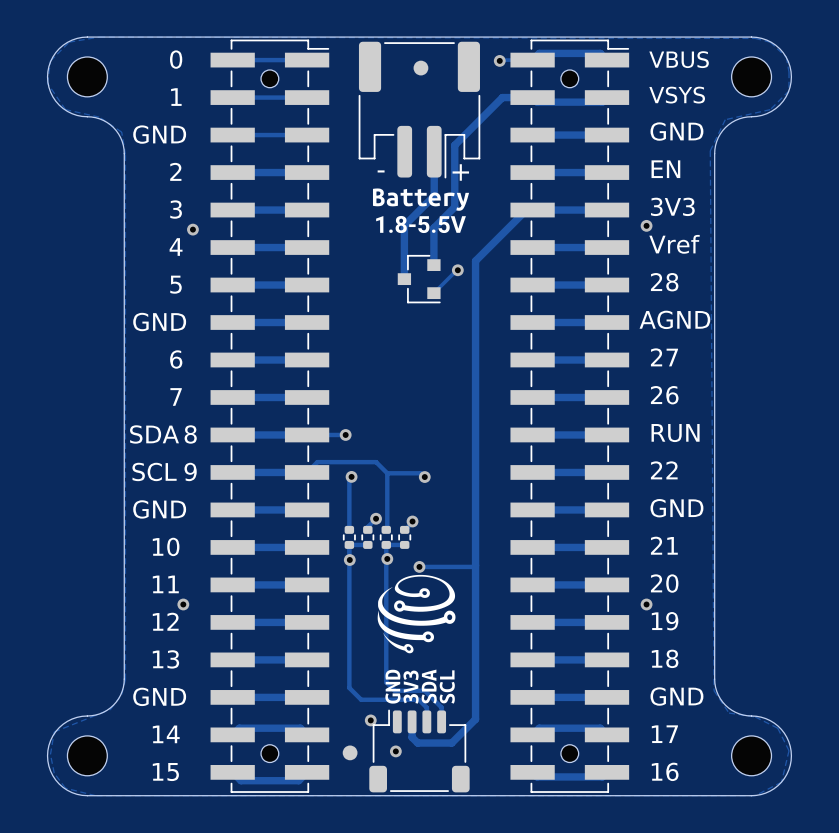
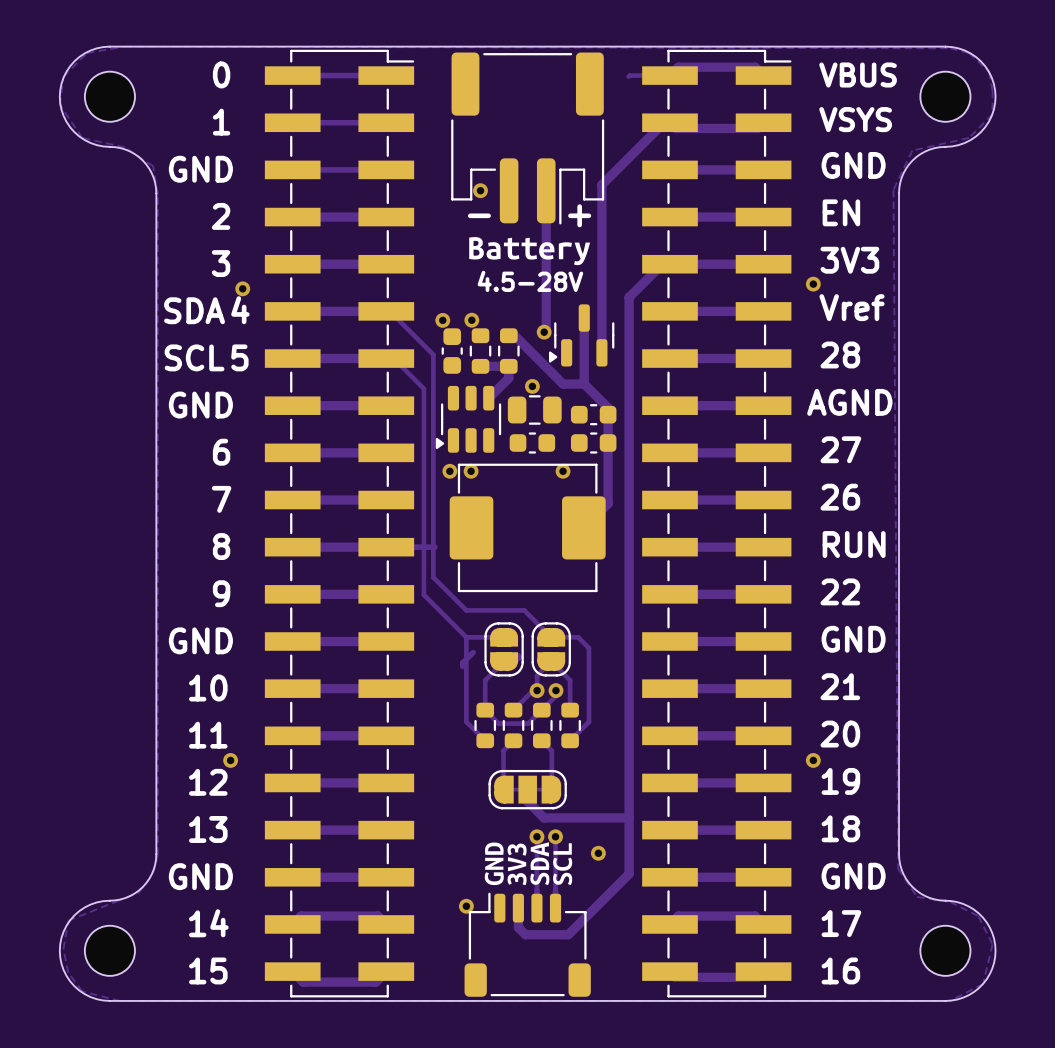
part footprint: [210, 39, 330, 793] -> [264, 49, 415, 998]
part footprint: [510, 39, 630, 793] -> [642, 49, 792, 998]
via: (499, 60) -> none
part: (420, 68) -> none
track: (527, 97) (502, 97) (454, 145) (454, 207) (433, 227) (433, 265) -> (664, 122) (601, 184) (601, 352)
via: none -> (480, 190)
track: (434, 195) (404, 225) (404, 279) -> (546, 246) (546, 330) (544, 332)
drawing: [376, 215, 466, 234] -> none
text: none -> 4.5-28V (530, 281)
track: (500, 236) (475, 260) (475, 719) -> (629, 297) (629, 873) (598, 904)
text position: 4 (176, 247) -> 4 (240, 310)
track: none -> (386, 311) (390, 311) (433, 354) (433, 577) (466, 610) (524, 610) (551, 637) (578, 637) (588, 648) (588, 721) (570, 740)
track: none -> (584, 318) (584, 384)
via: none -> (442, 320)
via: none -> (471, 320)
via: none -> (544, 332)
track: none -> (508, 335) (514, 335) (563, 384) (584, 384)
part: none -> (581, 335)
track: (457, 270) (433, 293) -> none
via: (457, 270) -> none
part: none -> (452, 351)
part: none -> (480, 351)
part: none -> (508, 351)
part: (419, 279) -> none
text position: 5 (176, 284) -> 5 (239, 357)
track: none -> (386, 358) (393, 358) (423, 388) (423, 594) (466, 637)
track: none -> (480, 366) (508, 366) (508, 378) (488, 398)
track: none -> (584, 384) (608, 407) (608, 503) (583, 527)
via: none -> (532, 386)
part: none -> (534, 409)
part: none -> (593, 414)
part: none -> (468, 419)
part: none -> (532, 443)
part: none -> (593, 443)
via: none -> (449, 471)
via: none -> (471, 471)
via: none -> (563, 471)
part: none -> (527, 527)
text position: SDA (154, 434) -> SDA (194, 310)
text position: 8 (190, 434) -> 8 (221, 546)
via: (345, 434) -> none
text position: SCL (154, 471) -> SCL (194, 357)
text position: 9 (190, 471) -> 9 (221, 593)
track: (307, 472) (317, 462) (376, 462) (387, 473) -> none
track: (387, 473) (386, 529) -> none
track: (387, 473) (421, 473) (424, 477) -> none
track: (351, 476) (349, 479) (349, 529) -> none
via: (351, 476) -> none
via: (424, 477) -> none
track: none -> (466, 637) (504, 637)
track: none -> (466, 637) (466, 721) (485, 740)
part: none -> (504, 649)
part: none -> (551, 649)
via: (376, 518) -> none
via: (412, 521) -> none
track: none -> (504, 661) (485, 680) (485, 710) (498, 723) (528, 723) (555, 695) (555, 690)
part: (349, 537) -> none
part: (367, 537) -> none
part: (386, 537) -> none
part: (404, 537) -> none
track: (349, 544) (349, 687) (361, 699) (418, 699) (426, 707) -> (536, 836) (536, 890)
track: (349, 544) (367, 544) -> none
track: (404, 544) (386, 544) (386, 682) (394, 690) (424, 690) (441, 707) -> (555, 836) (555, 890)
via: none -> (537, 690)
via: none -> (555, 690)
via: (387, 558) -> none
via: (349, 559) -> none
track: none -> (513, 710) (533, 690) (537, 690) (537, 675) (551, 661) (570, 680) (570, 710)
track: (475, 565) (419, 566) -> none
via: (419, 566) -> none
drawing: [377, 574, 456, 654] -> none
part: none -> (485, 725)
part: none -> (513, 725)
part: none -> (541, 725)
part: none -> (570, 725)
track: none -> (513, 740) (503, 750) (503, 789)
track: none -> (541, 740) (551, 750) (551, 789)
track: none -> (527, 789) (527, 801) (544, 817) (629, 817)
part: none -> (527, 789)
via: none -> (536, 836)
via: none -> (555, 836)
via: none -> (598, 853)
via: (395, 751) -> none
part: (350, 752) -> none

